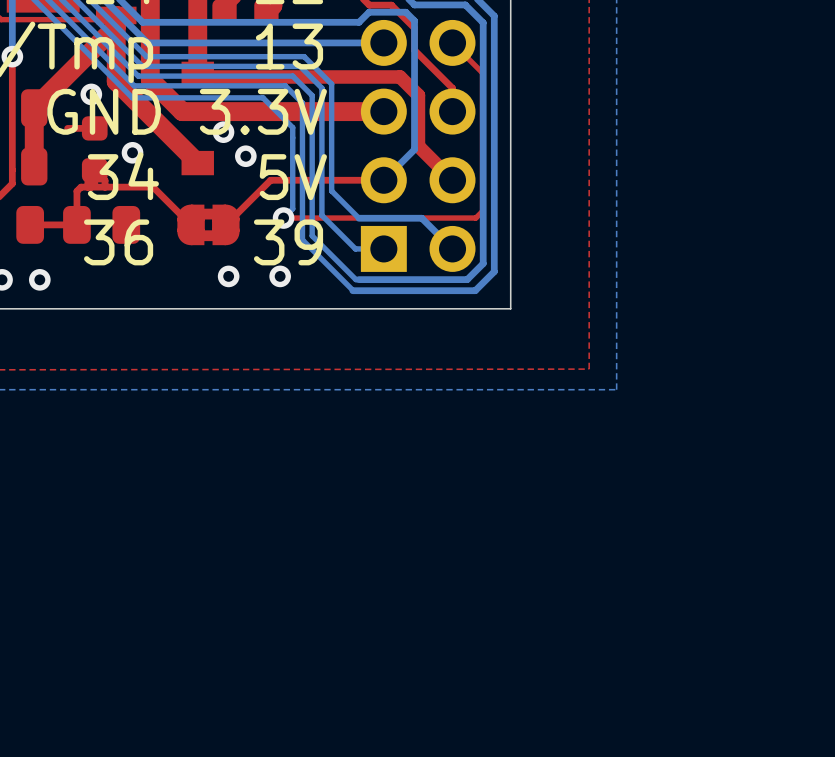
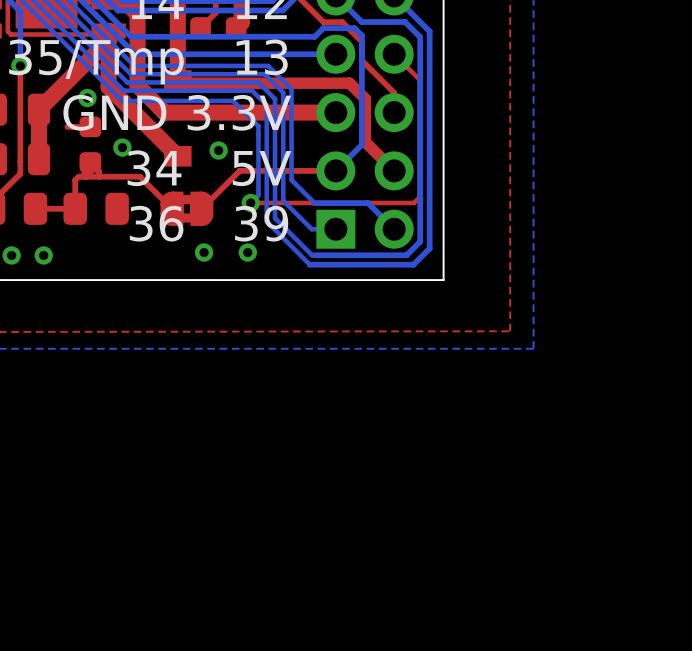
via: (223, 132) -> none

